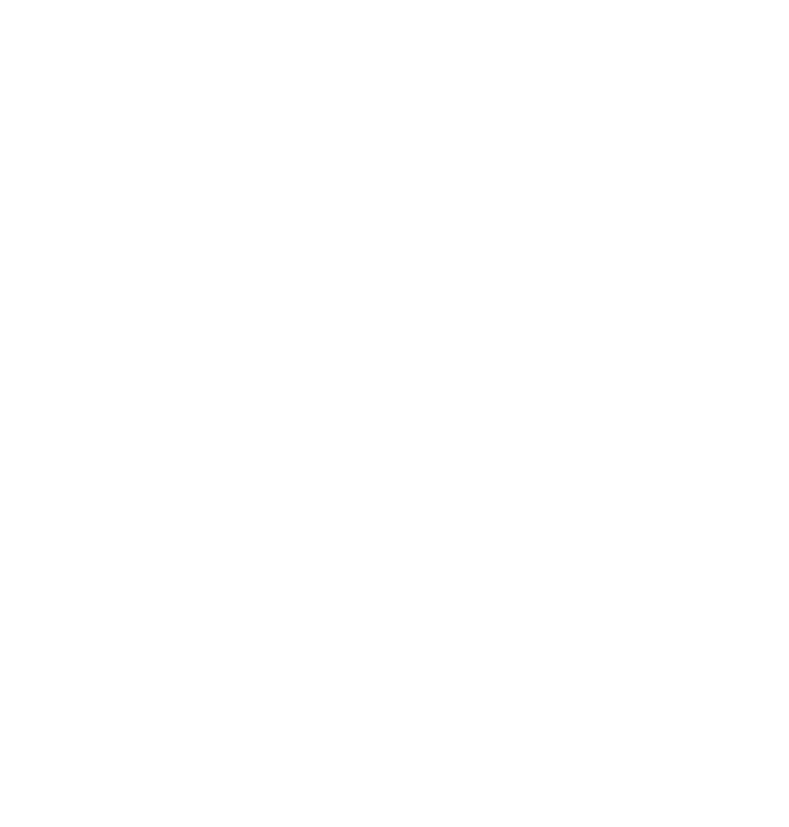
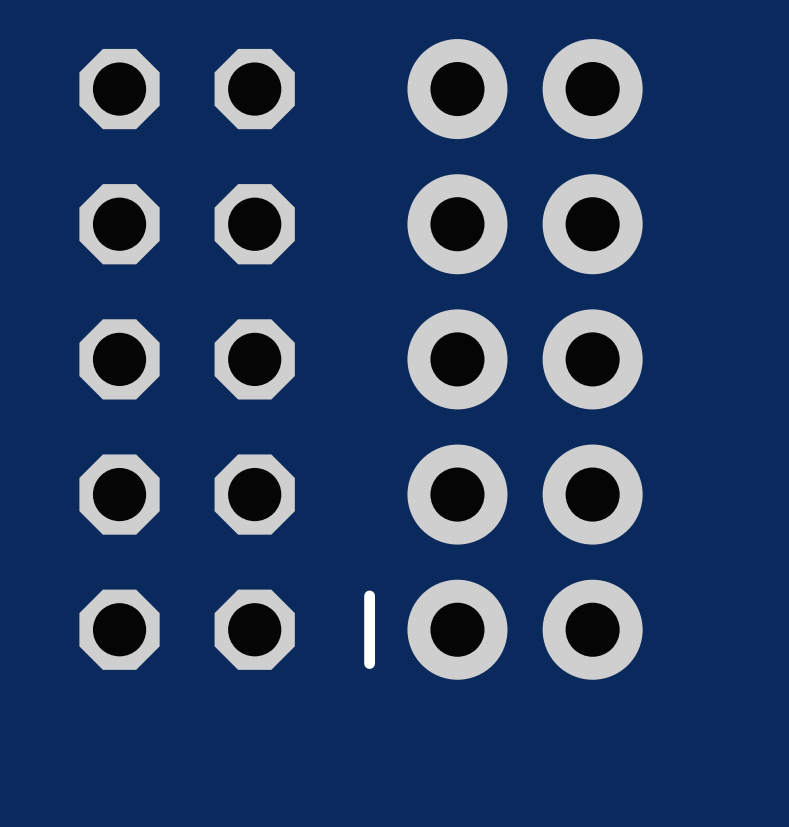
part: none -> (187, 359)
part: none -> (503, 359)

